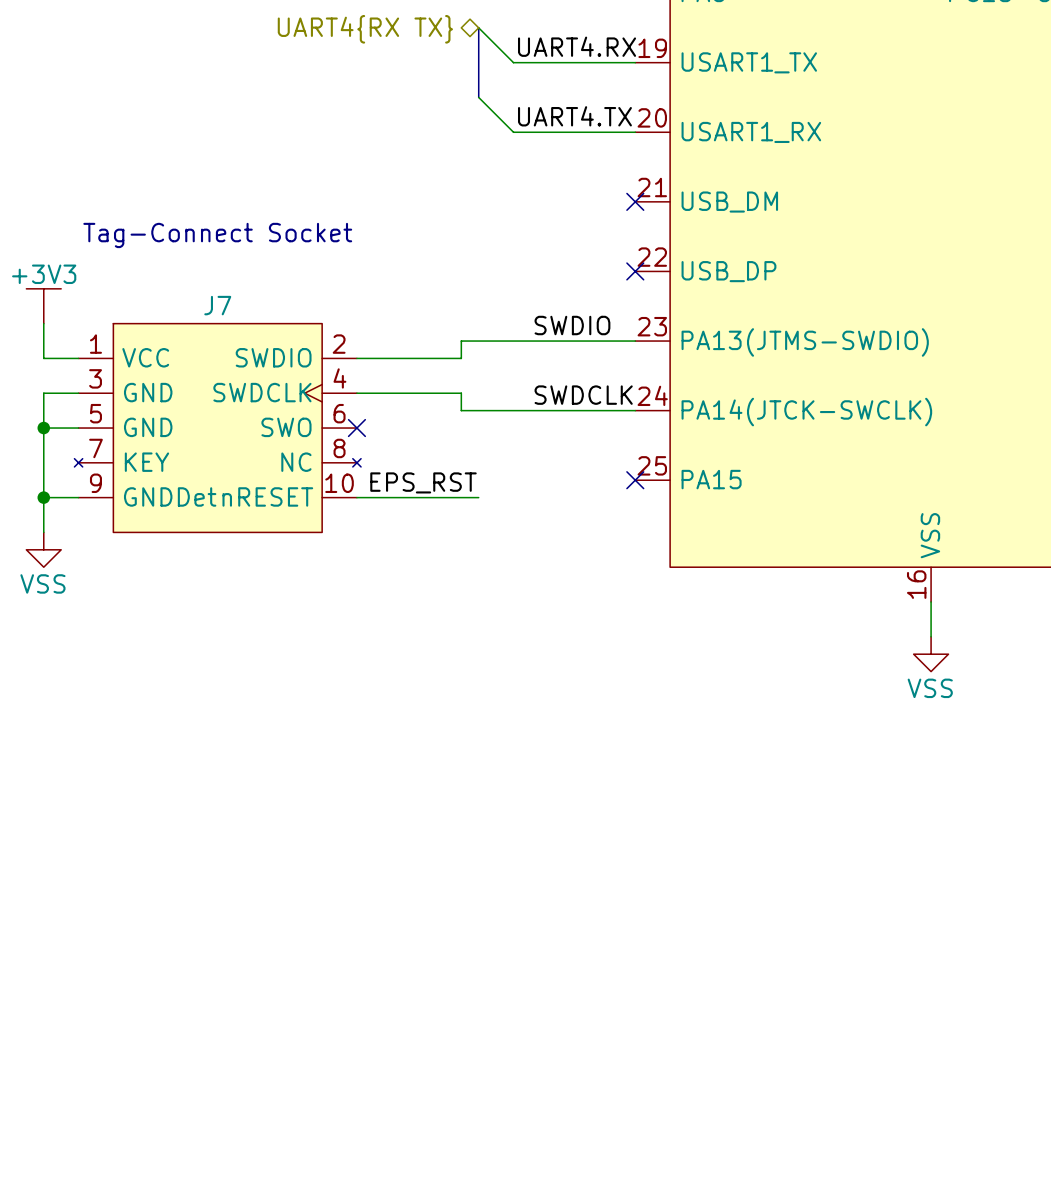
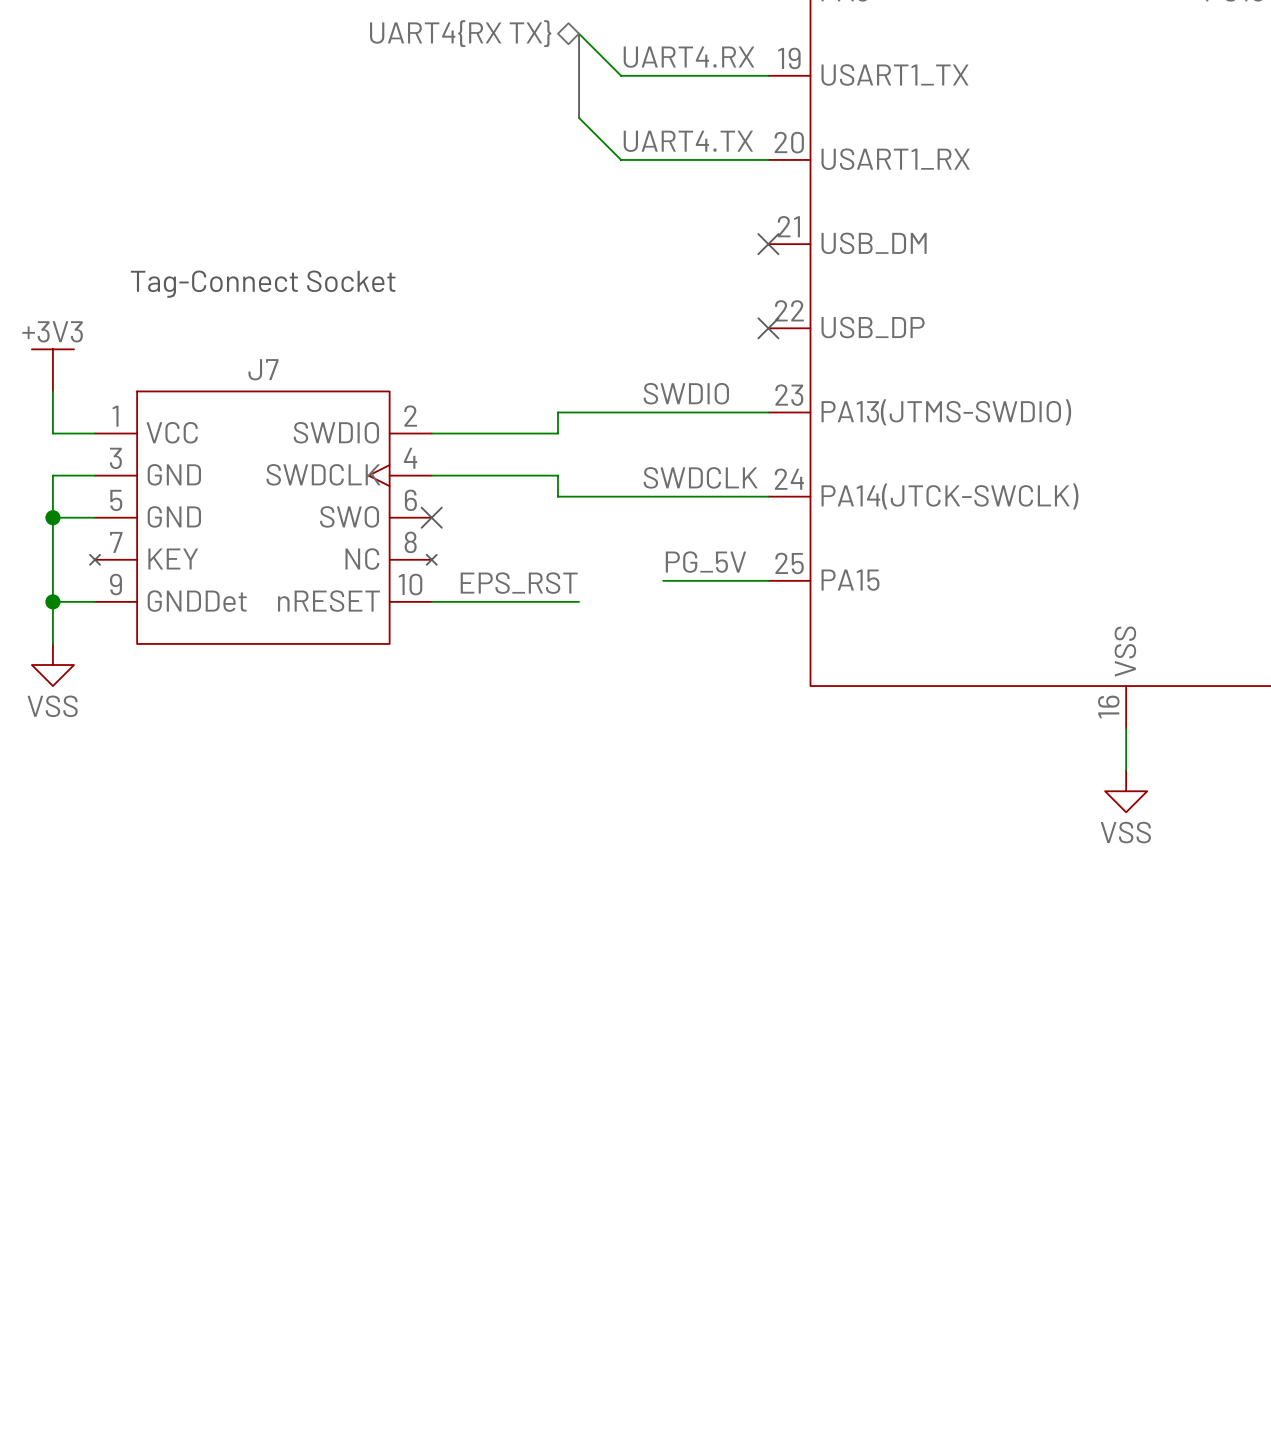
label: none -> PG_5V (705, 562)
wire: none -> (663, 580) (768, 580)
no-connect mark: (635, 480) -> none

